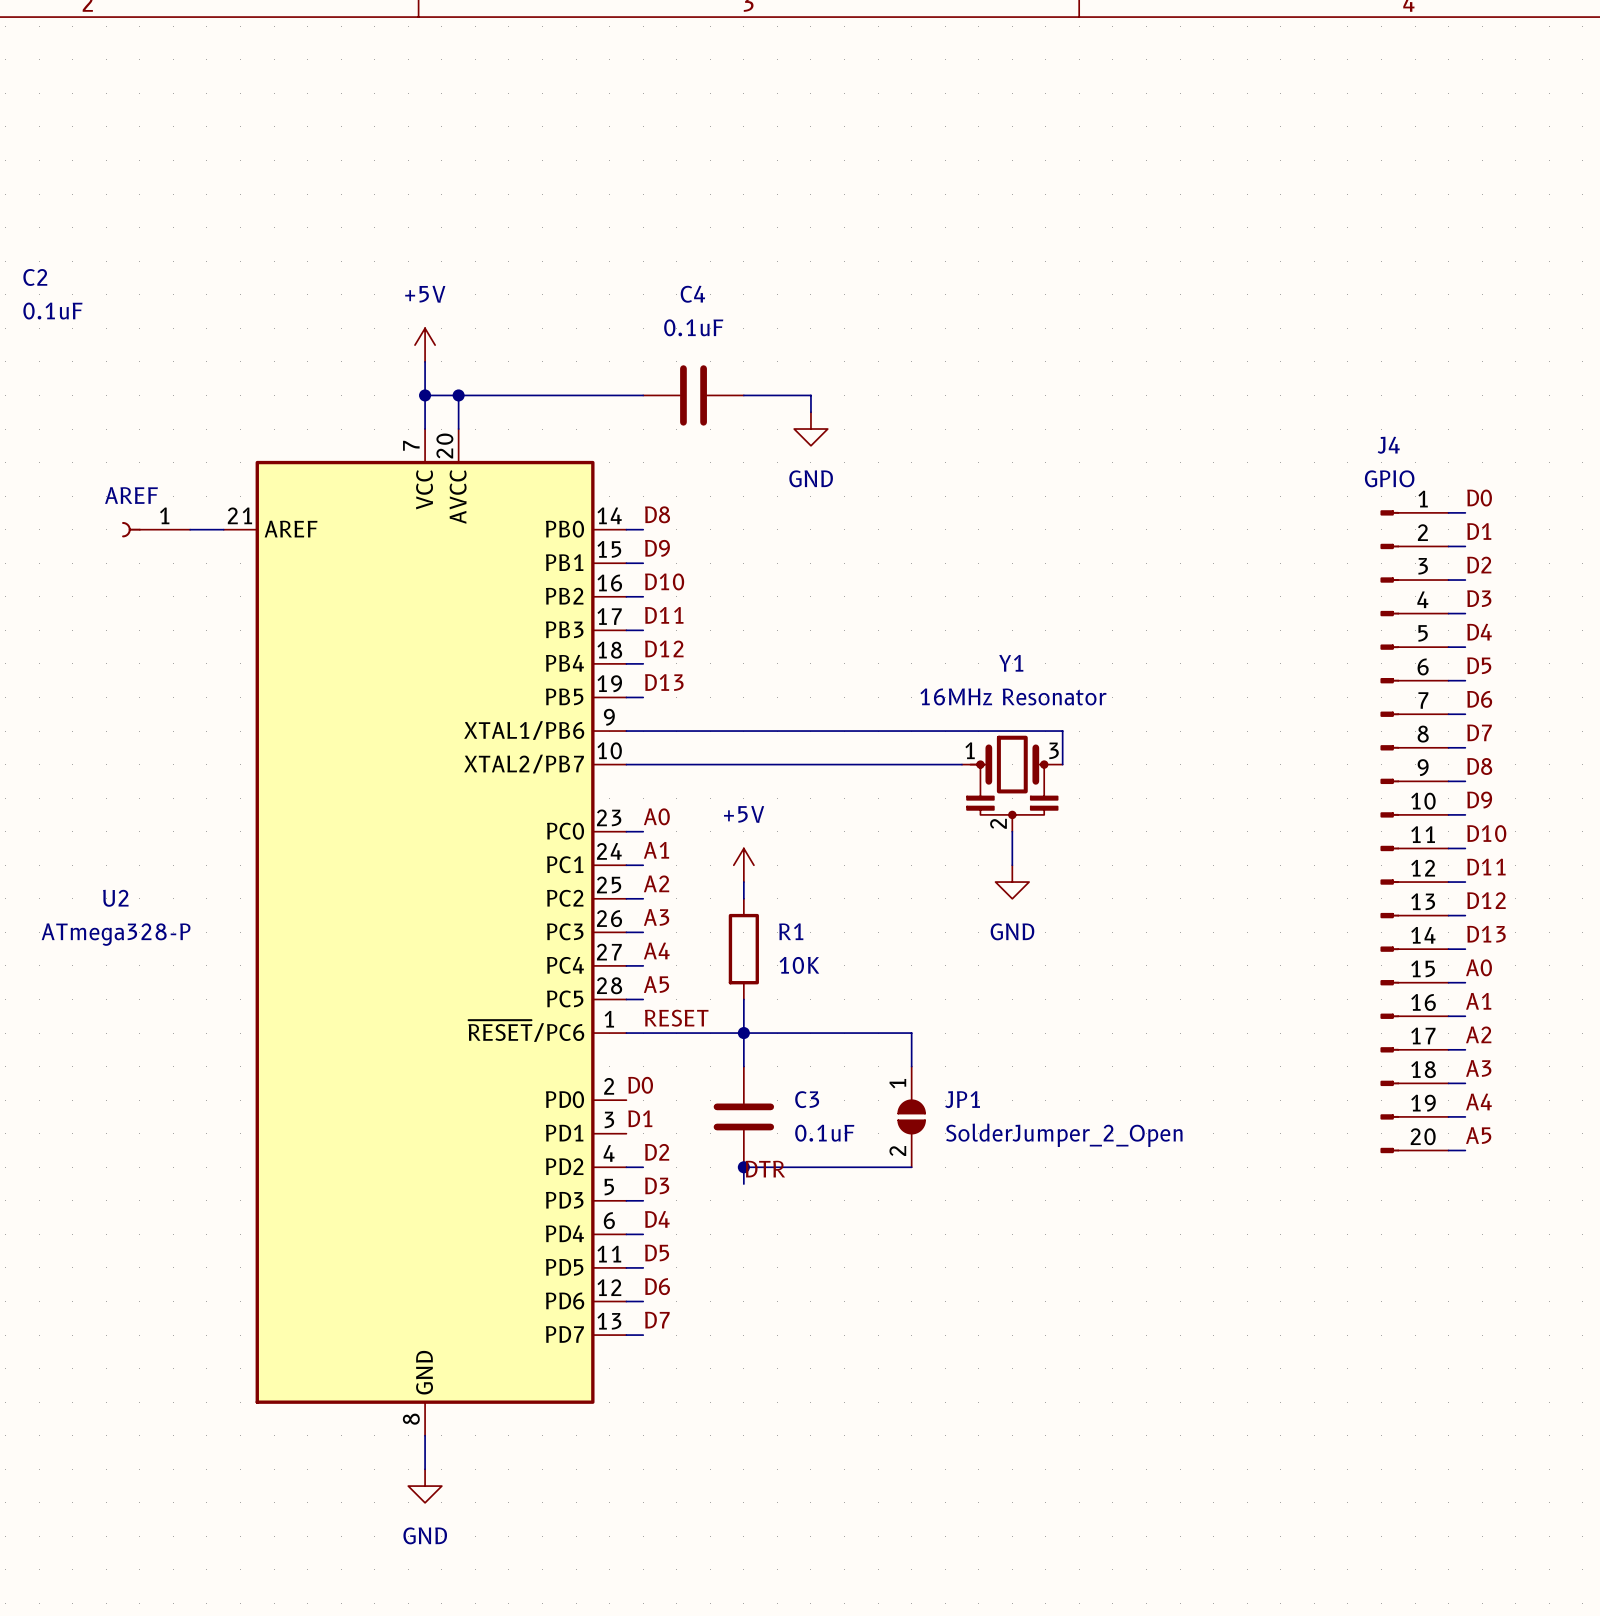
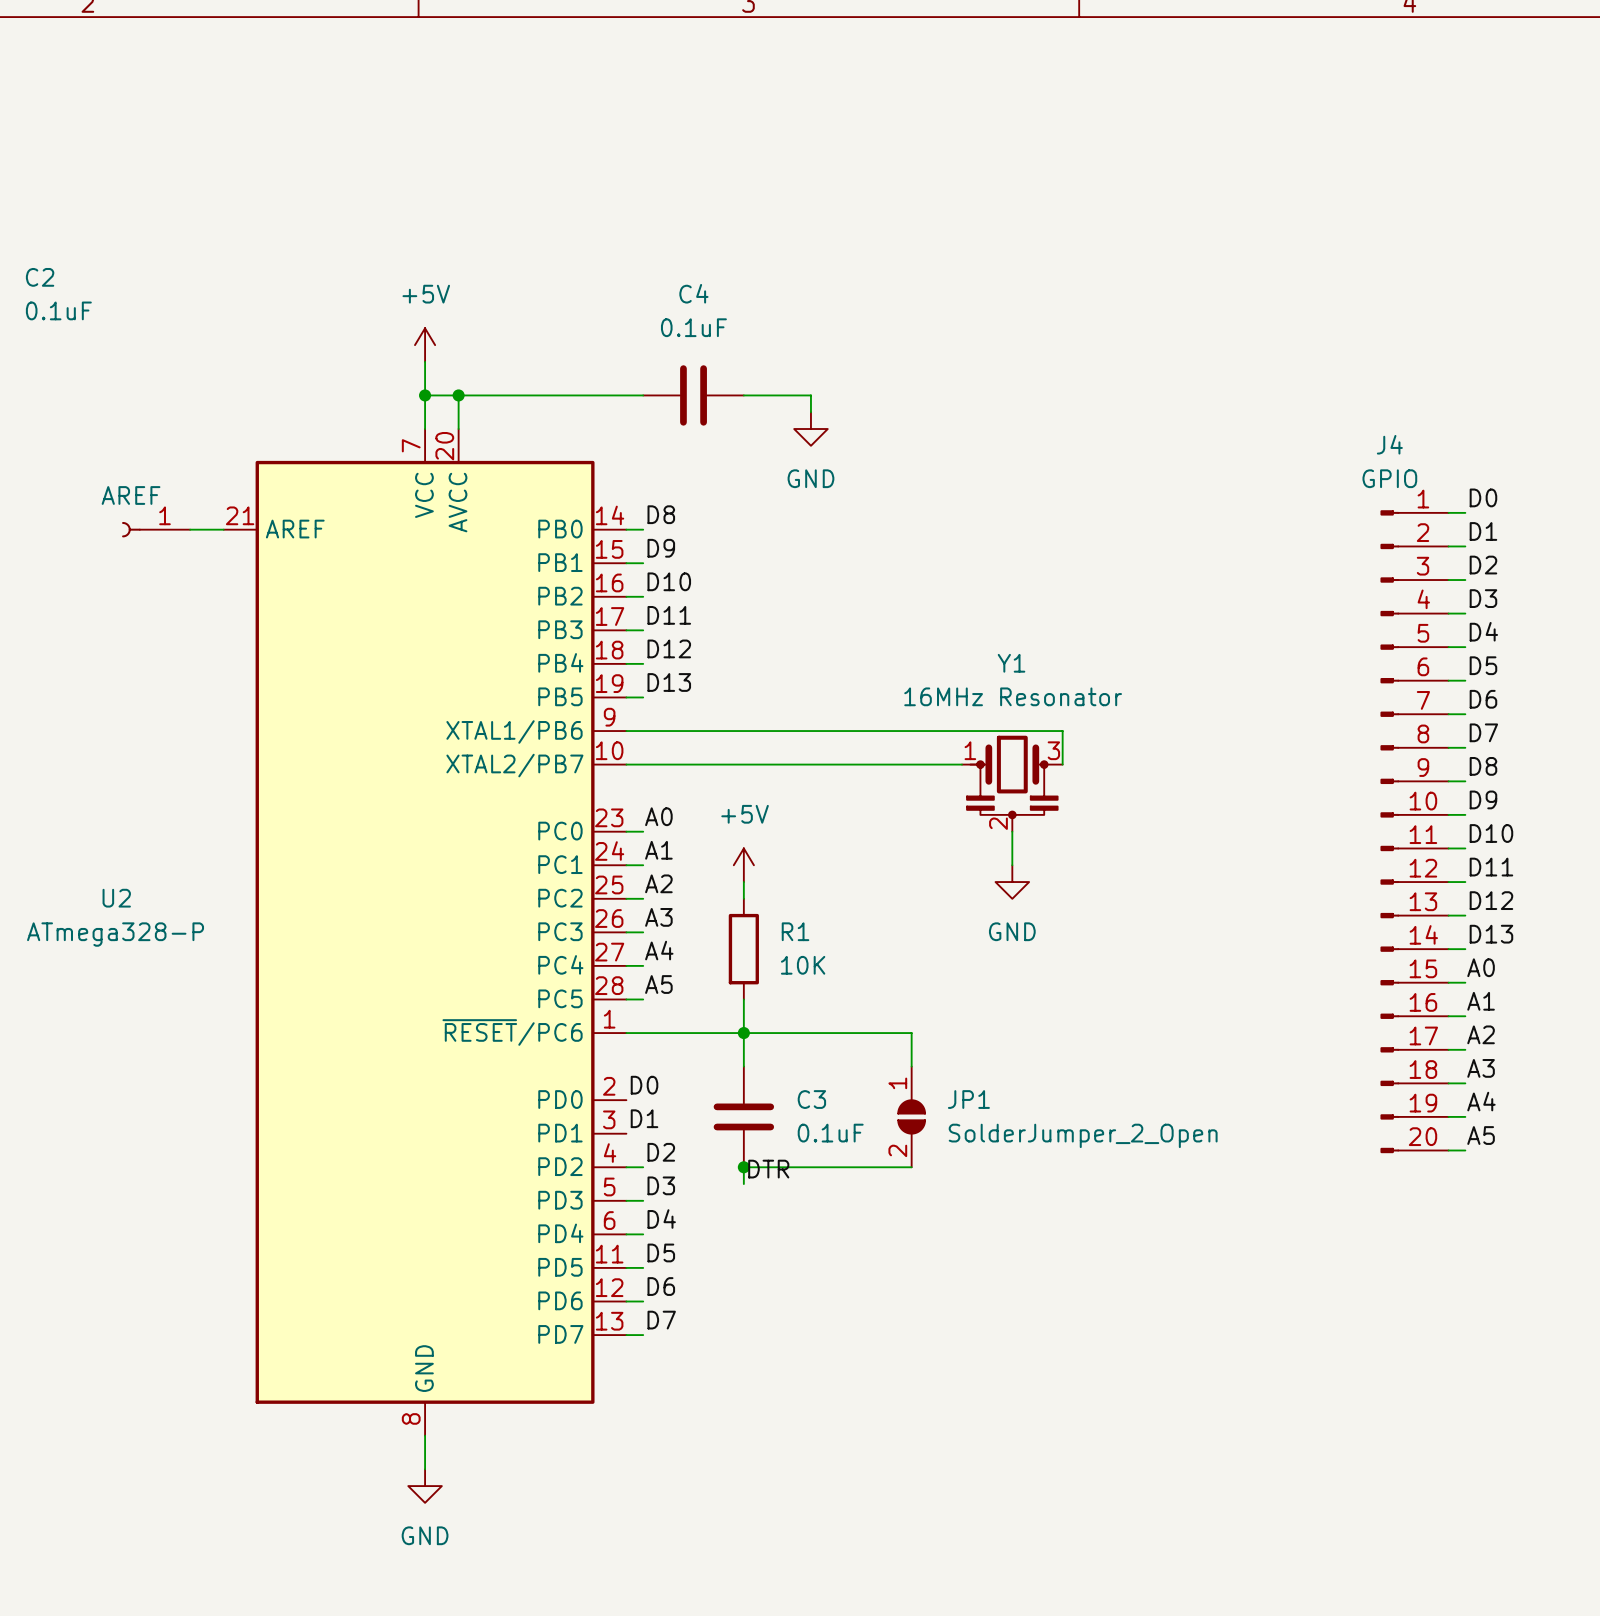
label: RESET (676, 1018) -> none

